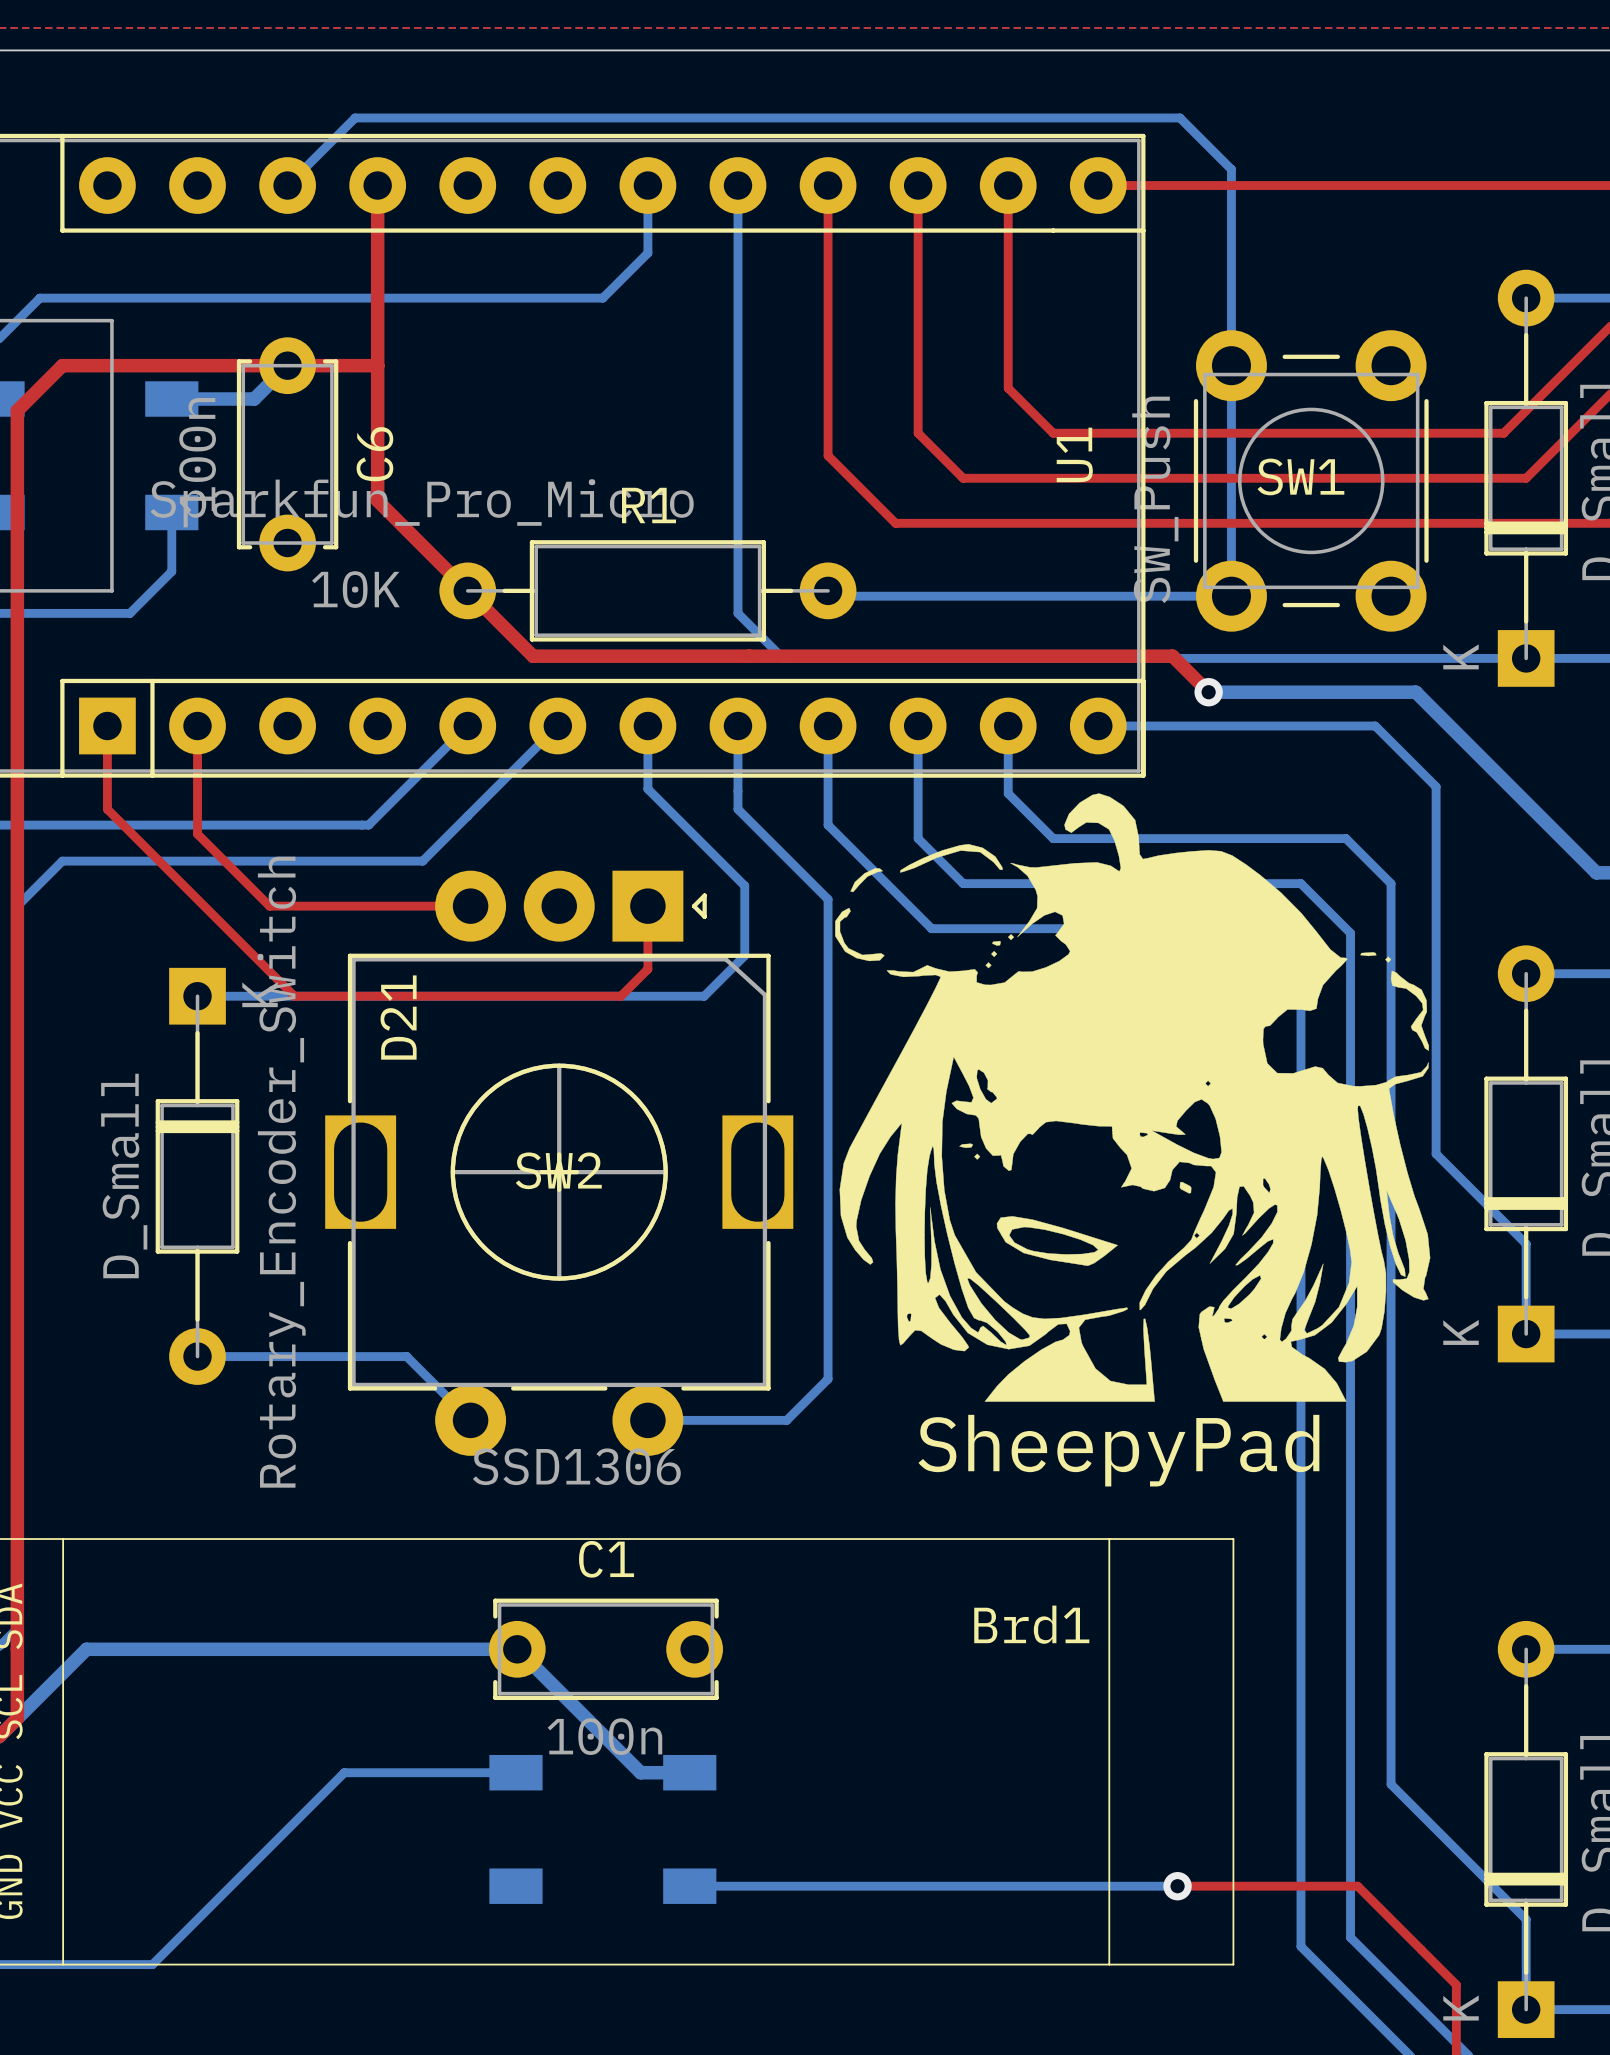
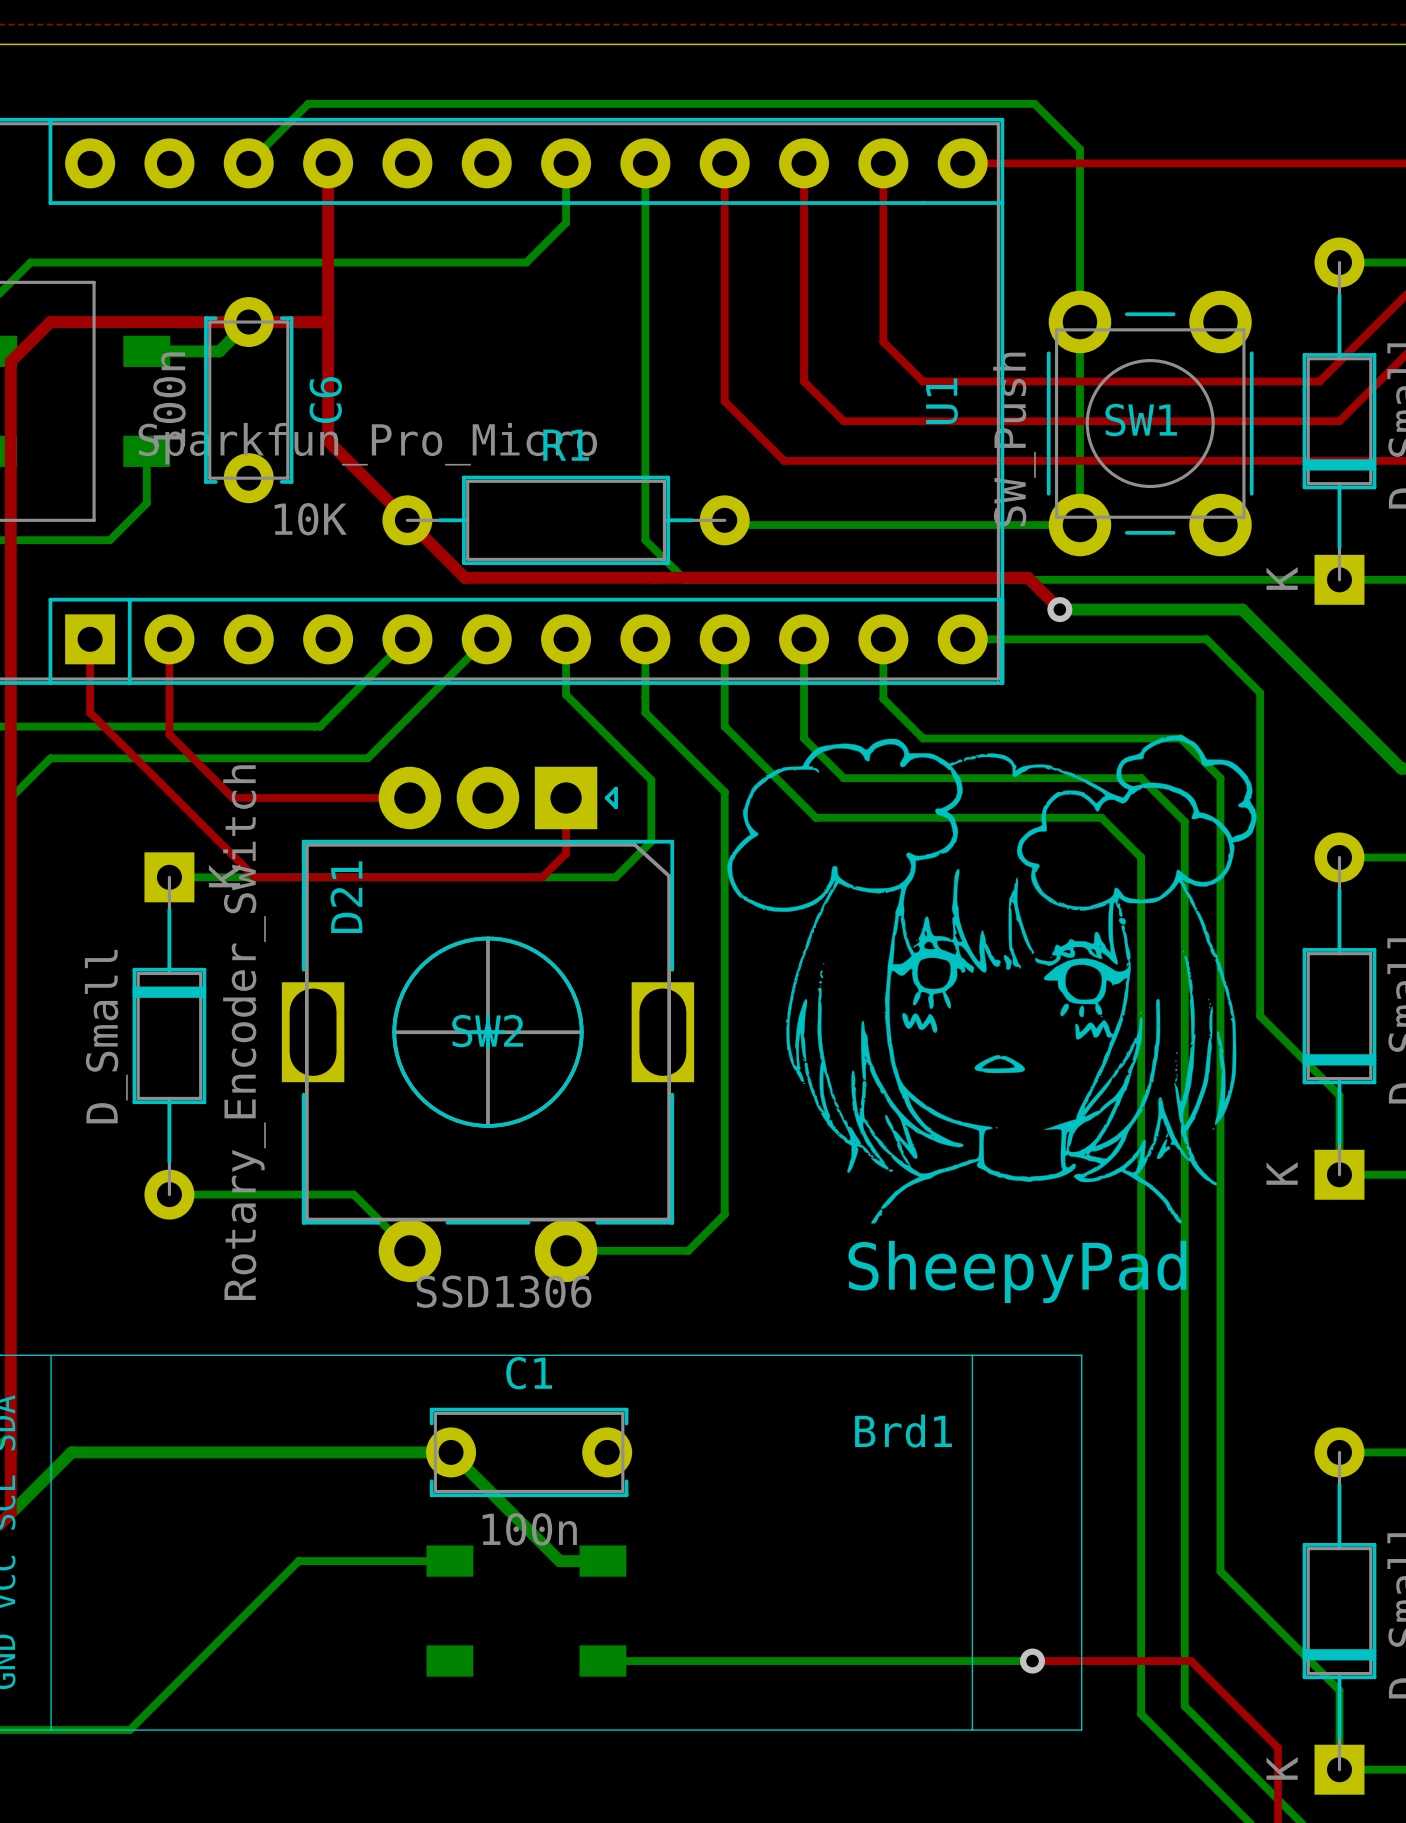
drawing shape: [835, 793, 1431, 1402] -> [727, 735, 1257, 1224]
text position: SheepyPad (1118, 1450) -> SheepyPad (1017, 1271)

